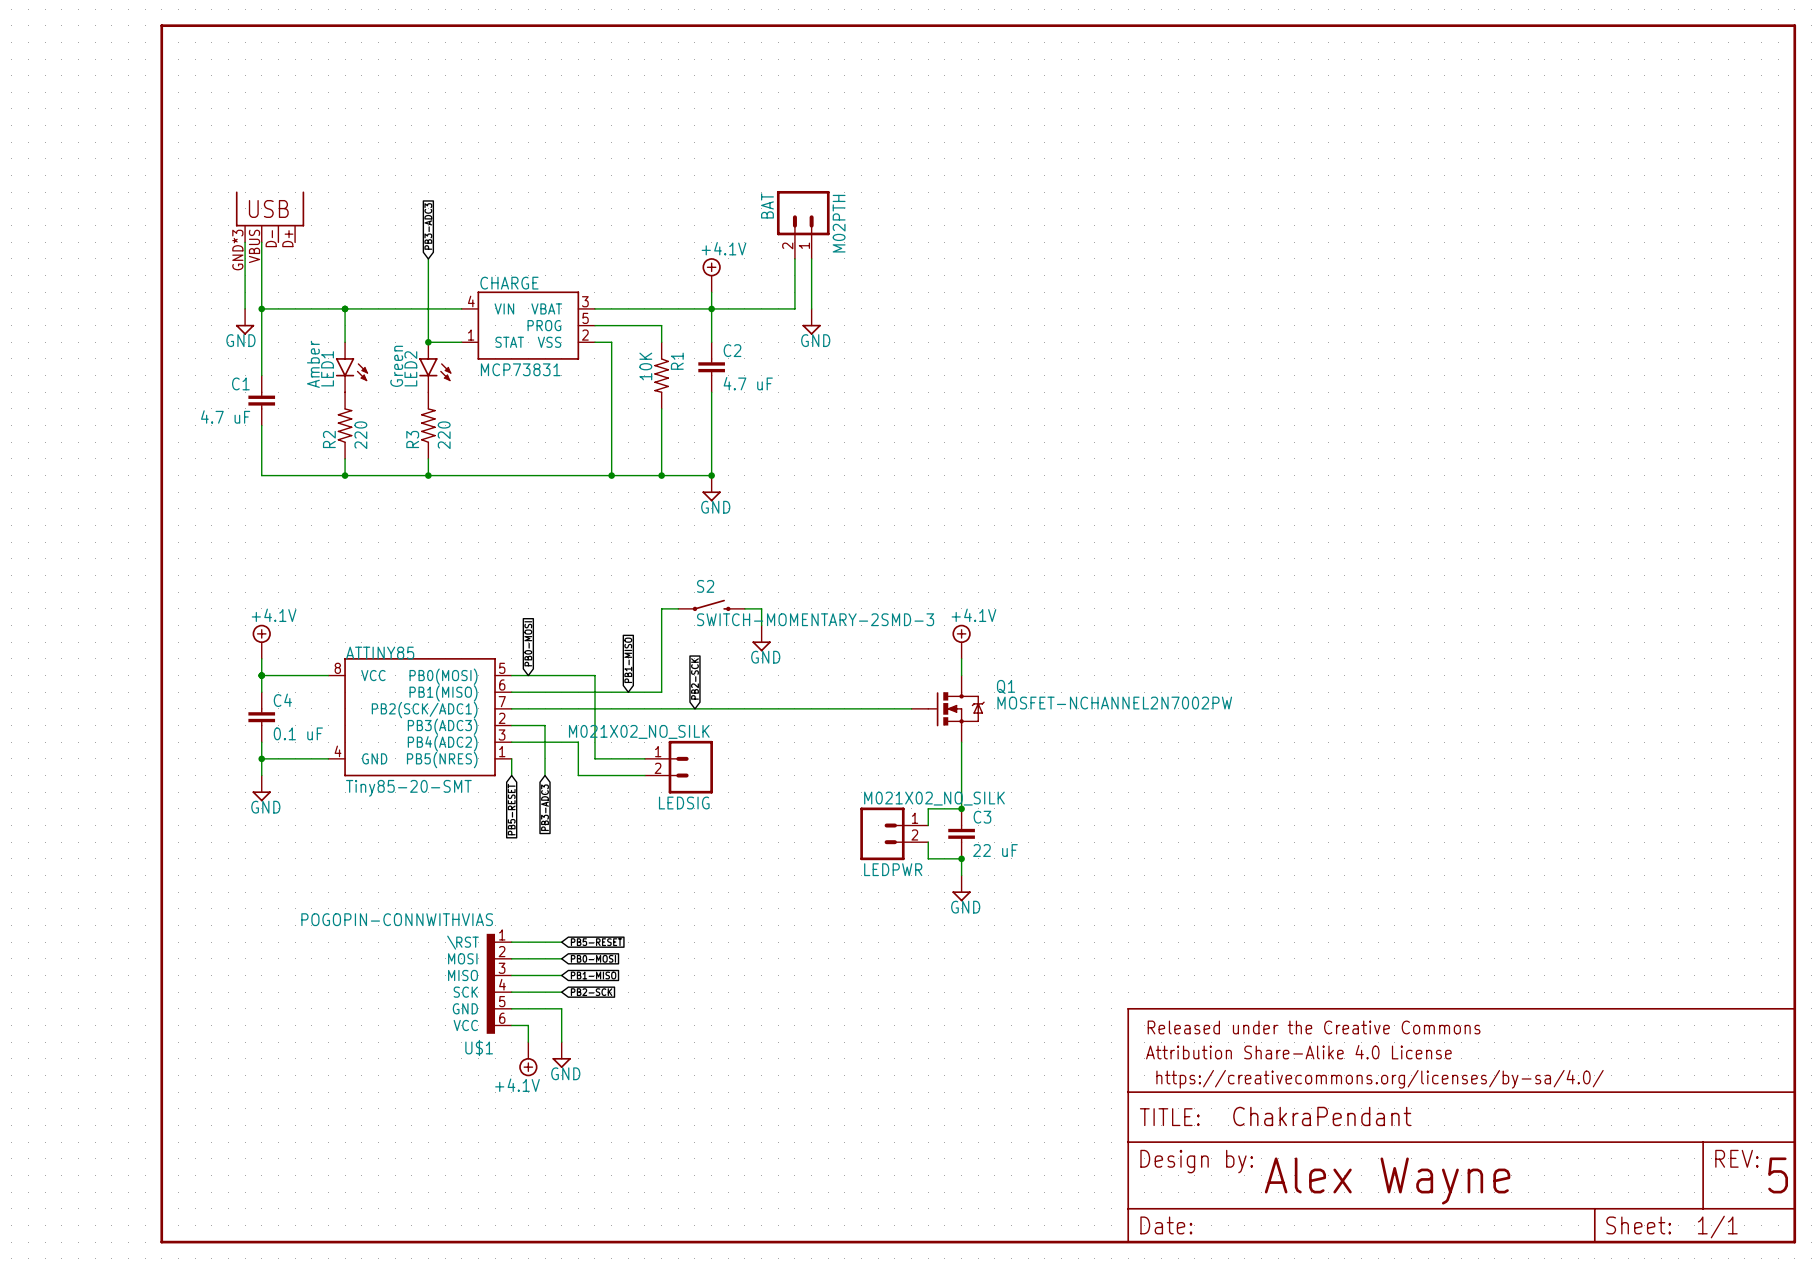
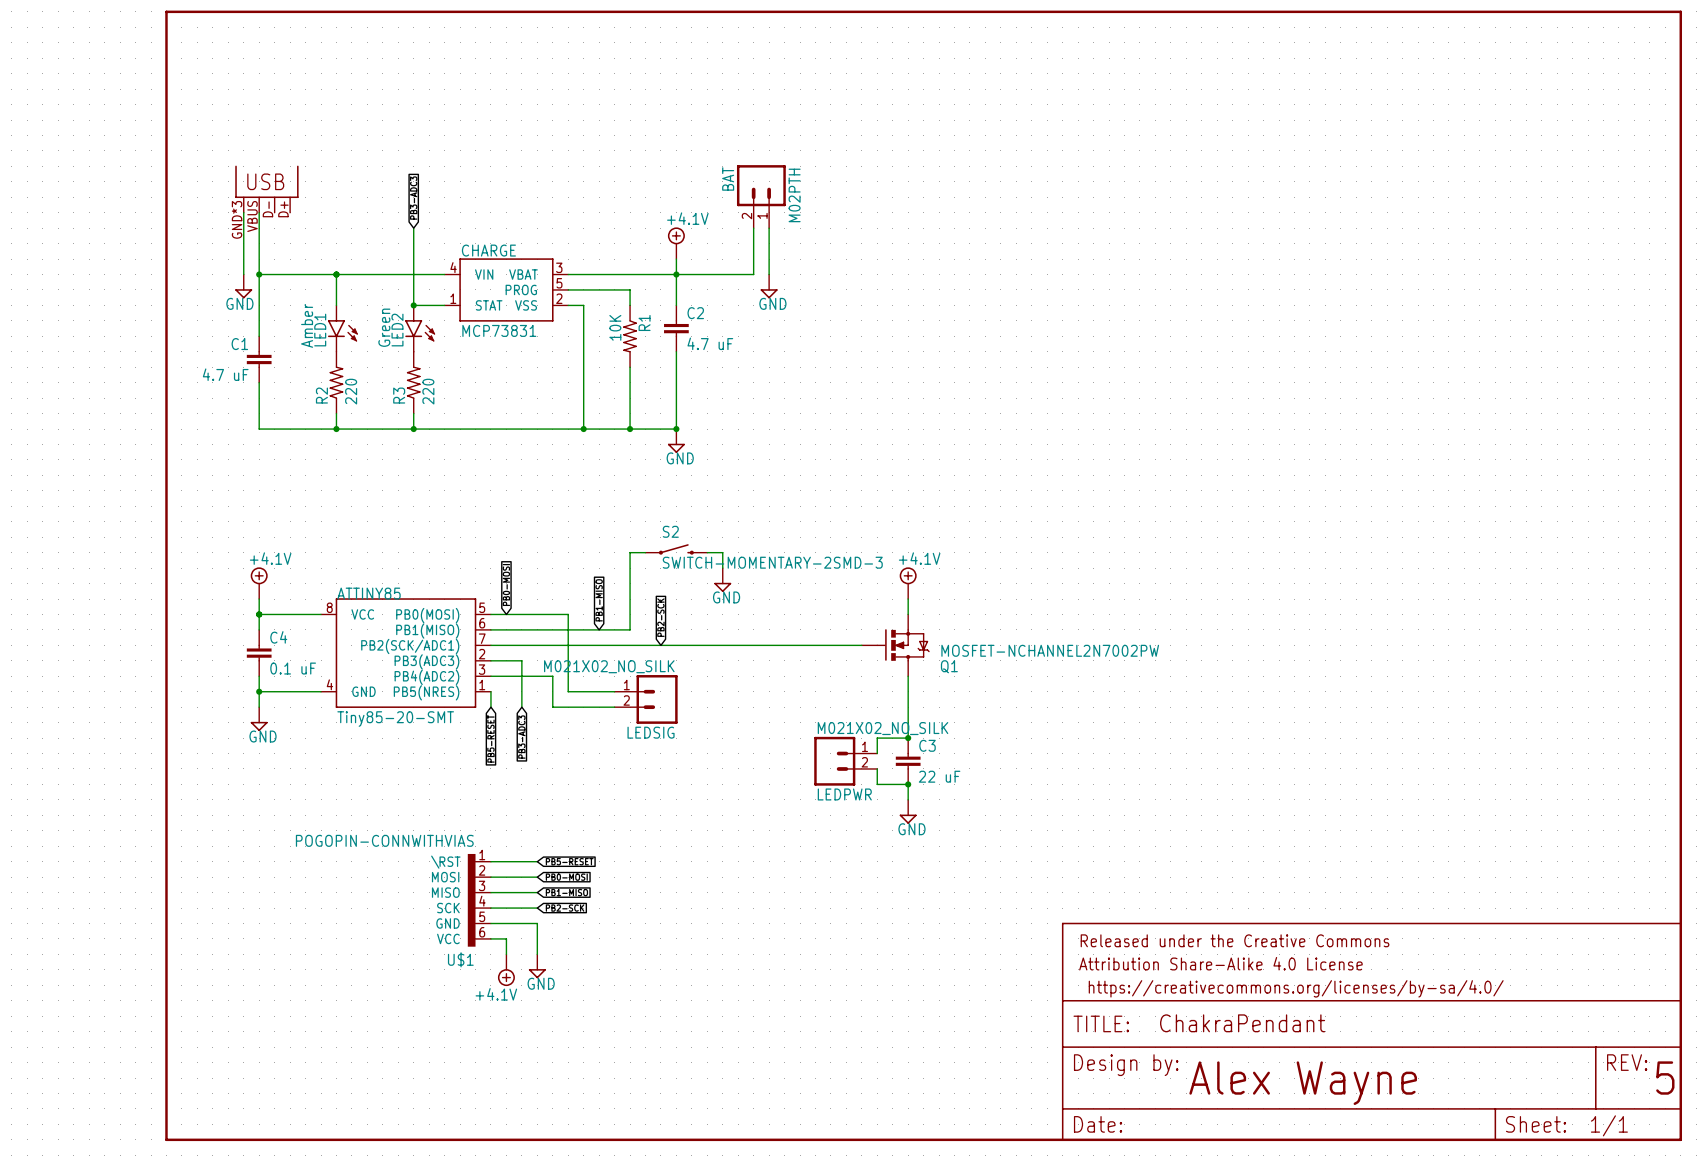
Q1 flip: as is (956, 709) -> up-down (903, 645)

